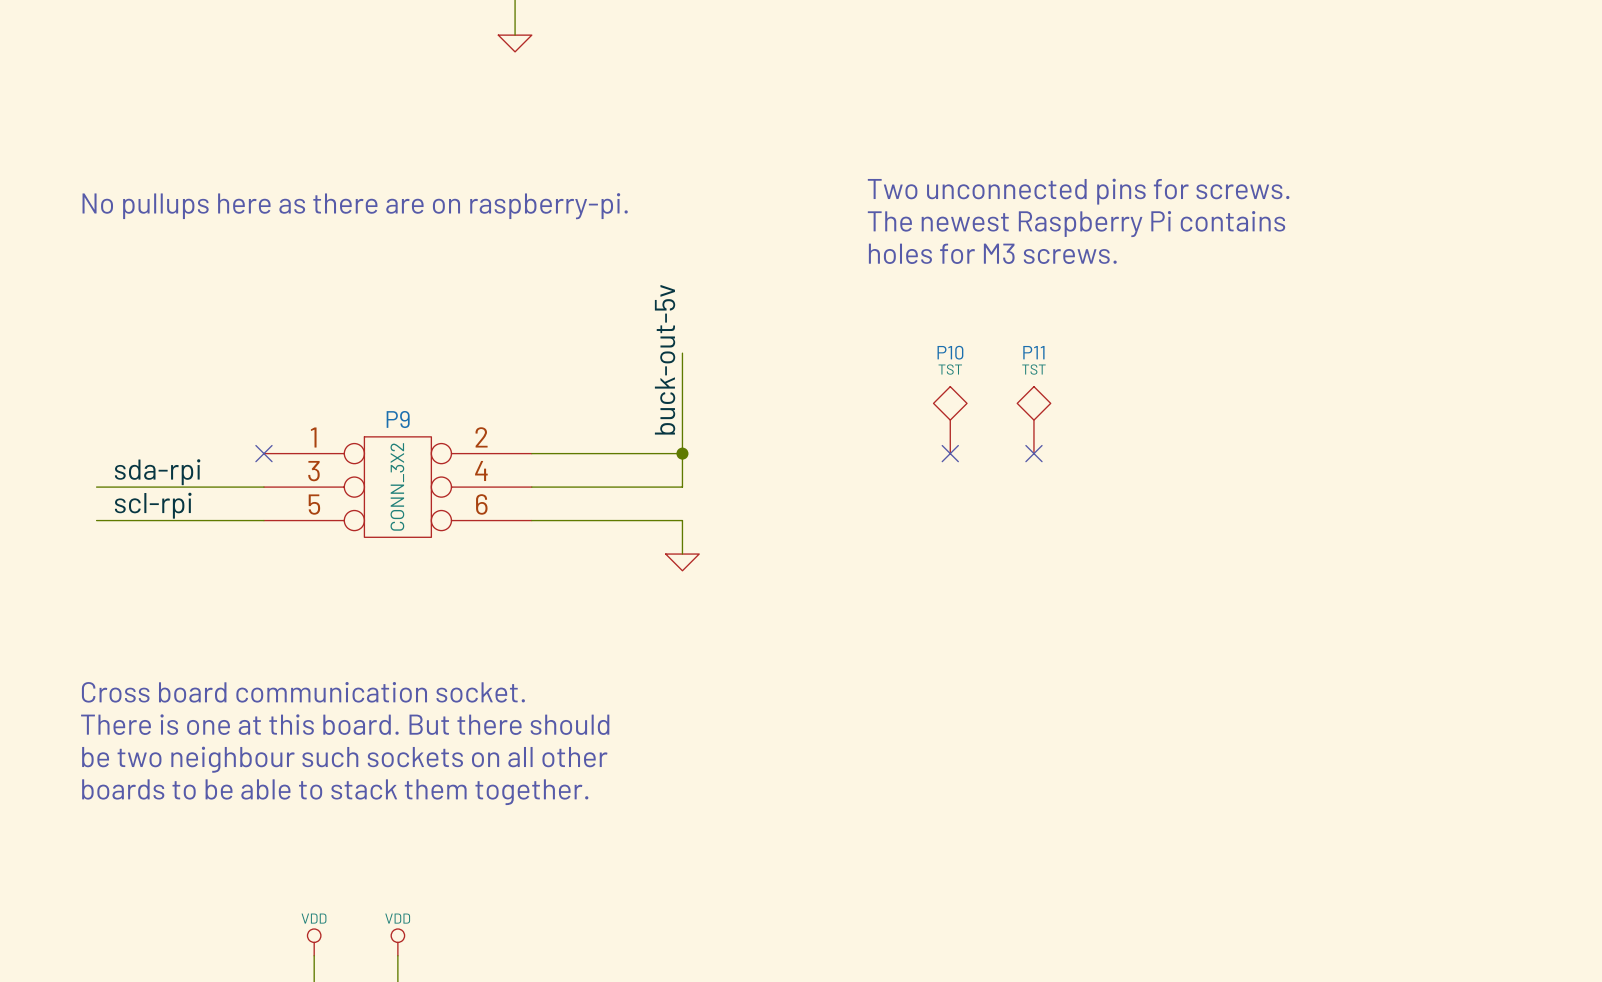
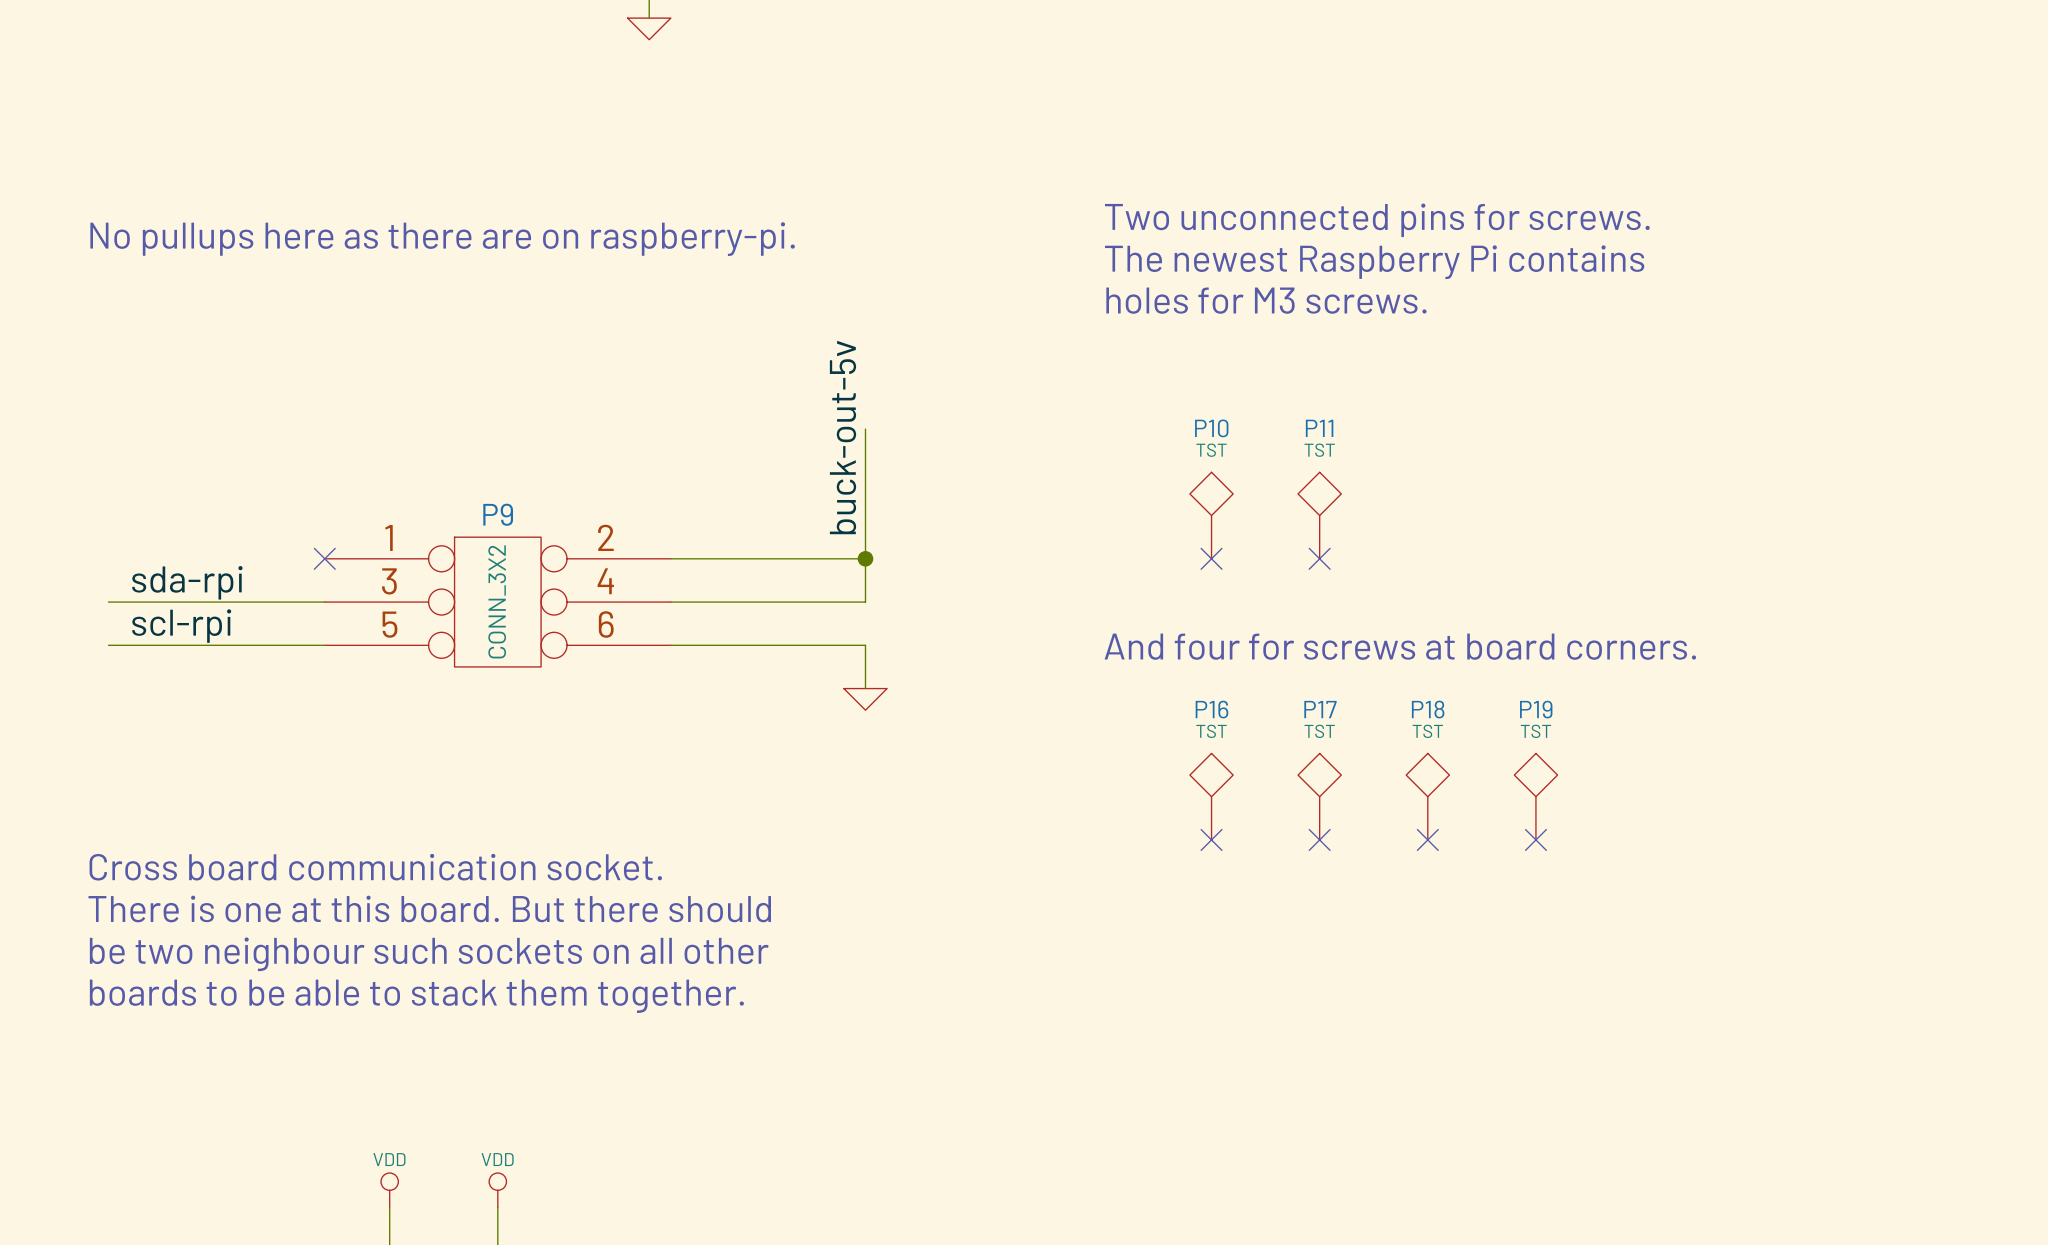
text: none -> And four for screws at board corners. (1400, 646)
P16: none -> TST (1211, 796)
P17: none -> TST (1319, 796)
P18: none -> TST (1427, 796)
P19: none -> TST (1535, 796)
no-connect mark: none -> (1211, 839)
no-connect mark: none -> (1319, 839)
no-connect mark: none -> (1427, 839)
no-connect mark: none -> (1535, 839)

